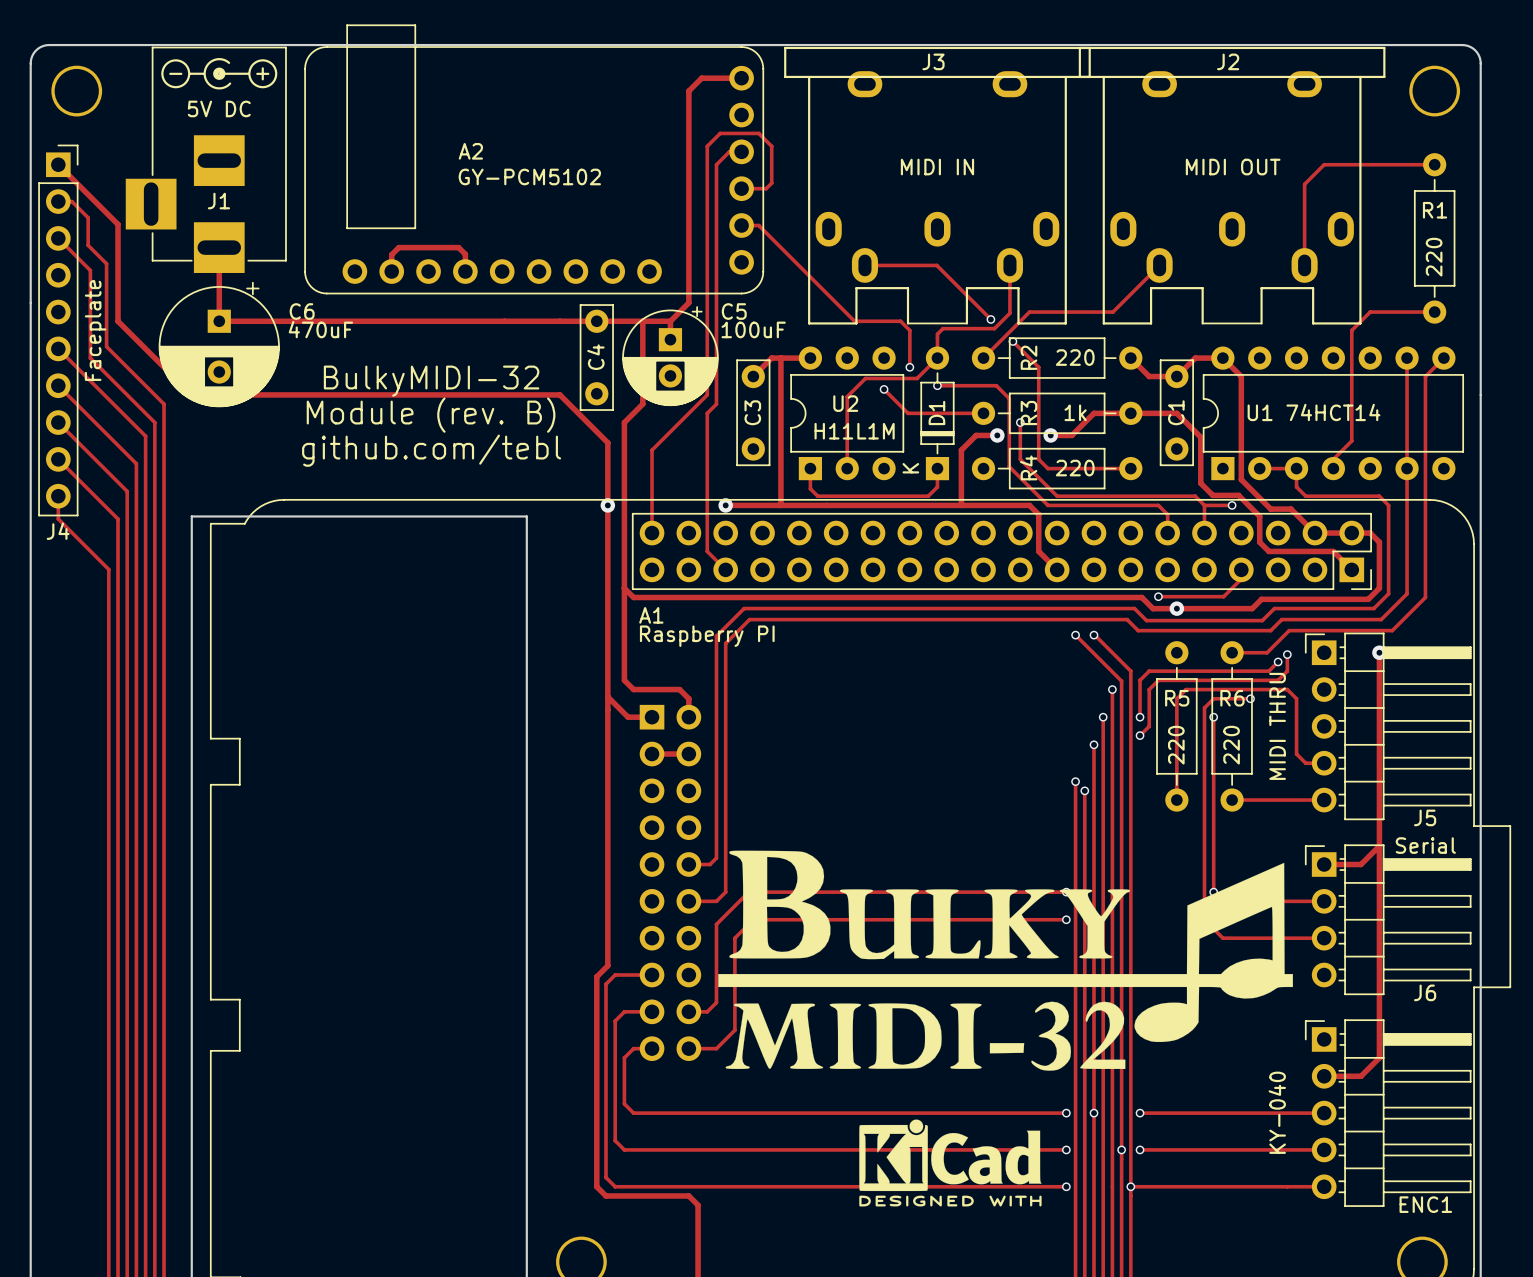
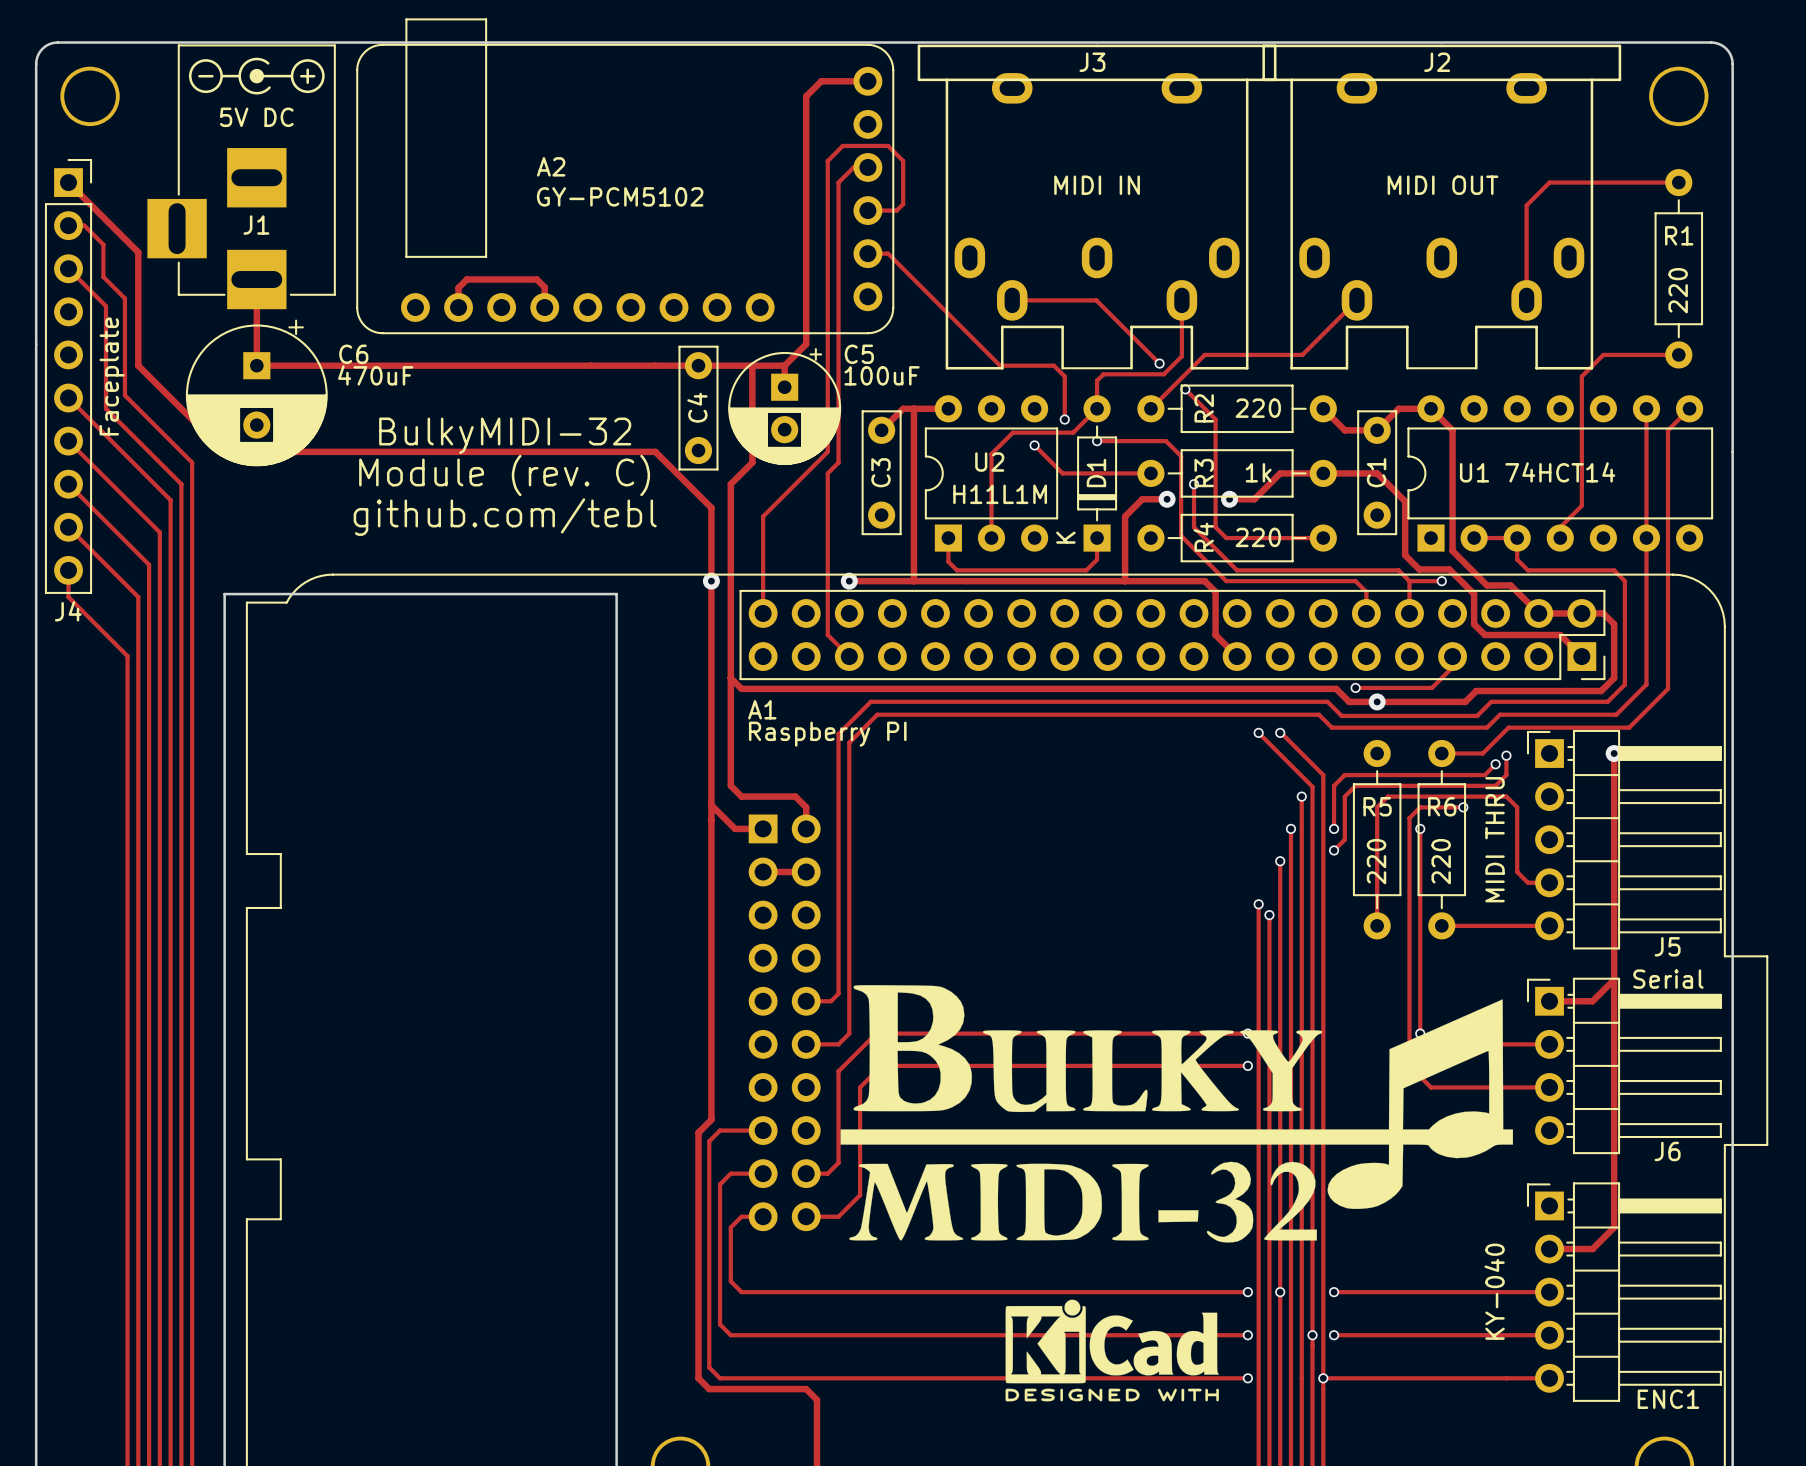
text: Module (rev. B) (431, 415) -> Module (rev. C) (504, 475)

